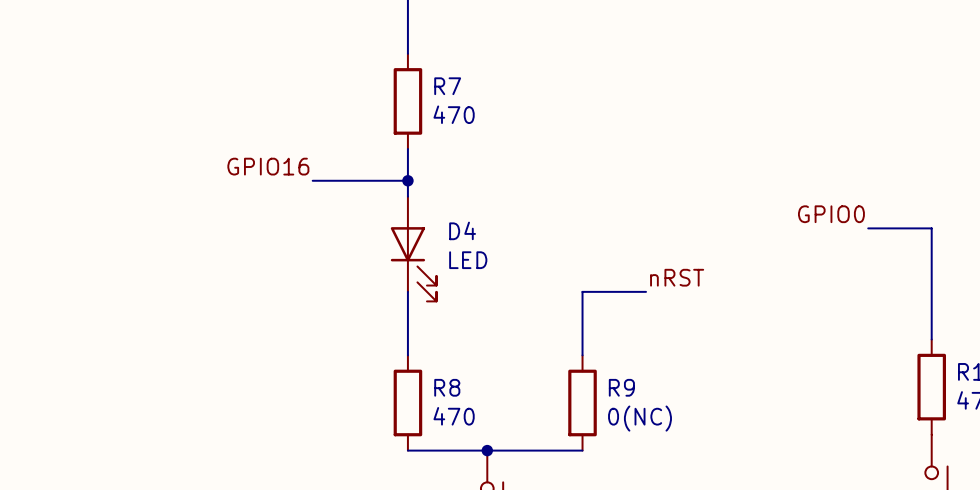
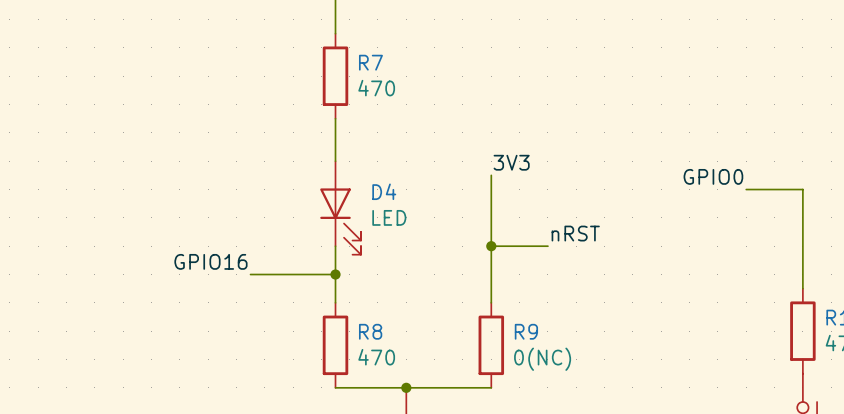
label position: GPIO16 (268, 166) -> GPIO16 (210, 261)
wire: (312, 180) (407, 180) -> (250, 274) (335, 274)
junction: (407, 180) -> none
label: none -> 3V3 (511, 162)
wire: none -> (491, 175) (491, 246)
junction: none -> (491, 246)
junction: none -> (335, 274)

